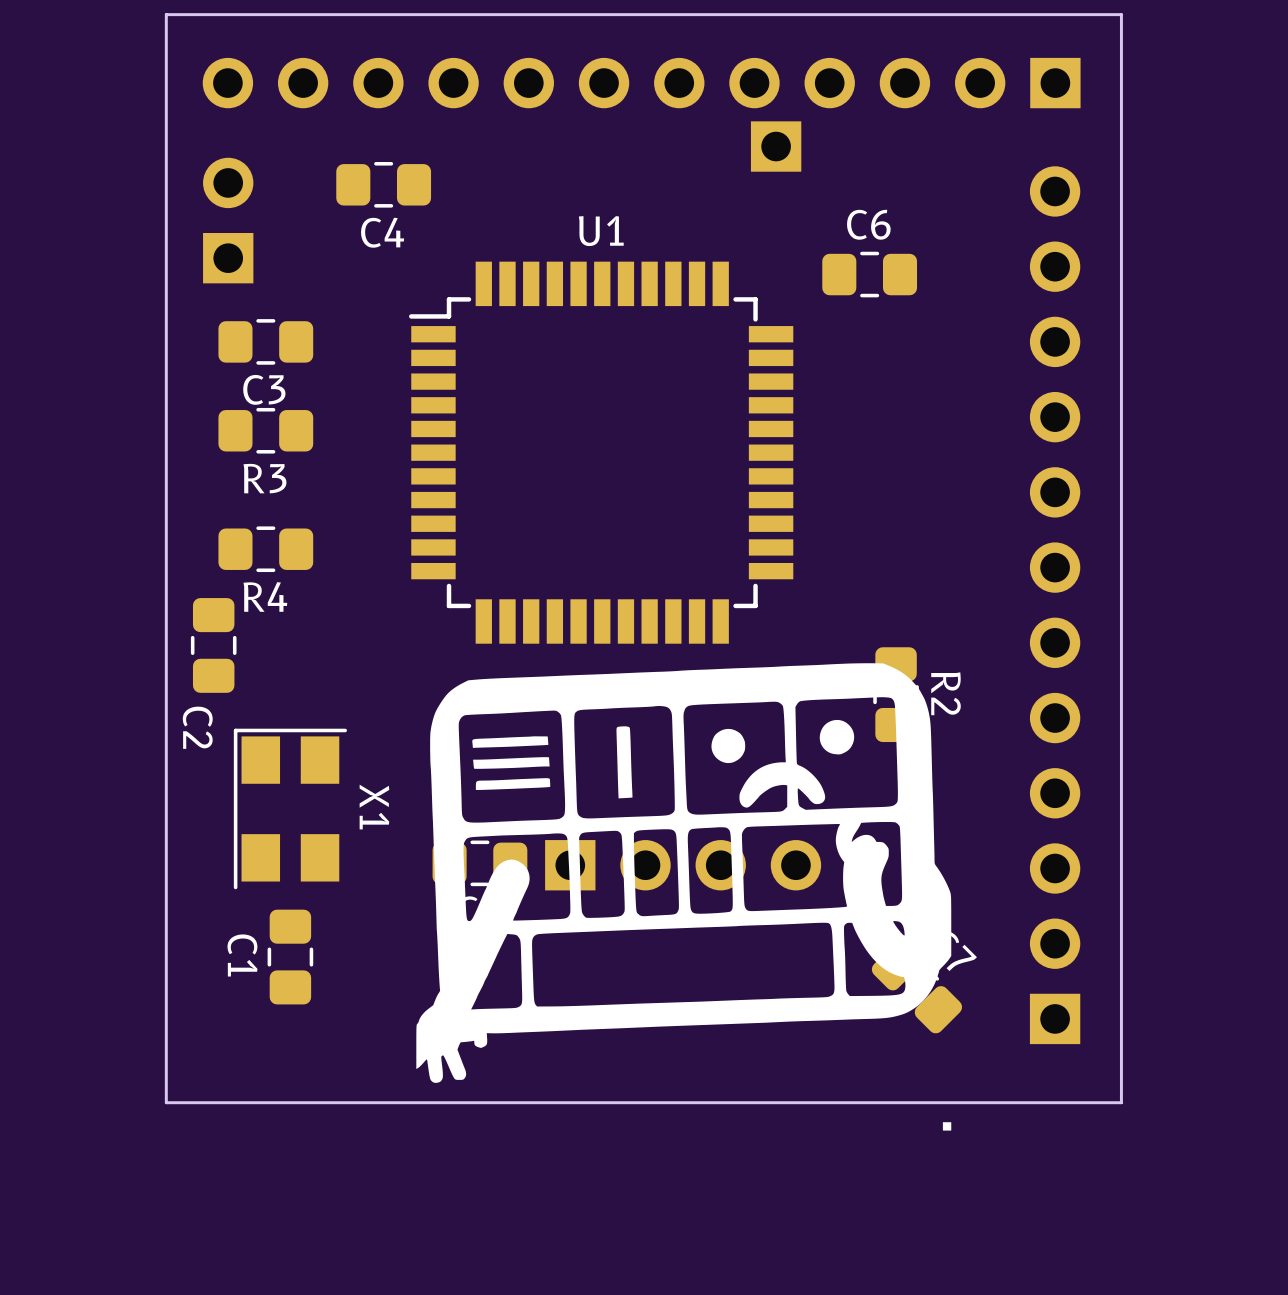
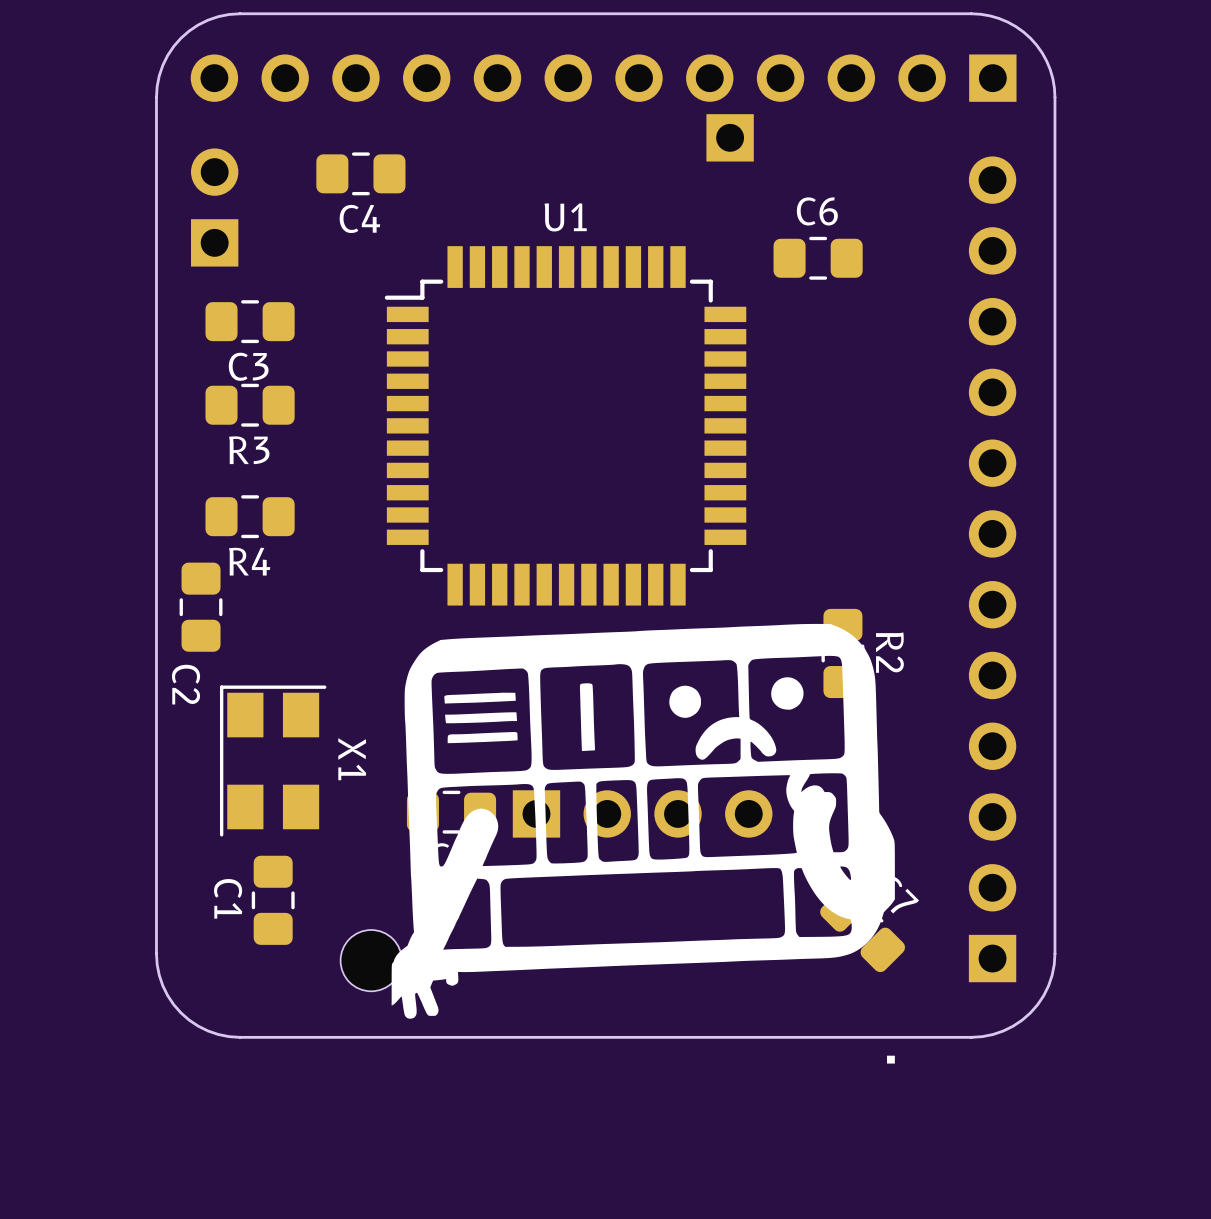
board edge: (255, 14) (166, 14) (166, 103) -> (240, 13) (208, 20) (180, 38) (162, 65) (156, 97)
board edge: (1032, 14) (1121, 14) (1121, 103) -> (971, 13) (998, 18) (1015, 26) (1030, 38) (1046, 61) (1052, 78) (1054, 97)
board edge: (166, 1013) (166, 1102) (255, 1102) -> (156, 953) (162, 985) (180, 1012) (208, 1031) (240, 1037)
board edge: (1121, 1013) (1121, 1102) (1032, 1102) -> (1054, 953) (1048, 985) (1030, 1012) (1003, 1031) (971, 1037)
part: none -> (371, 960)

